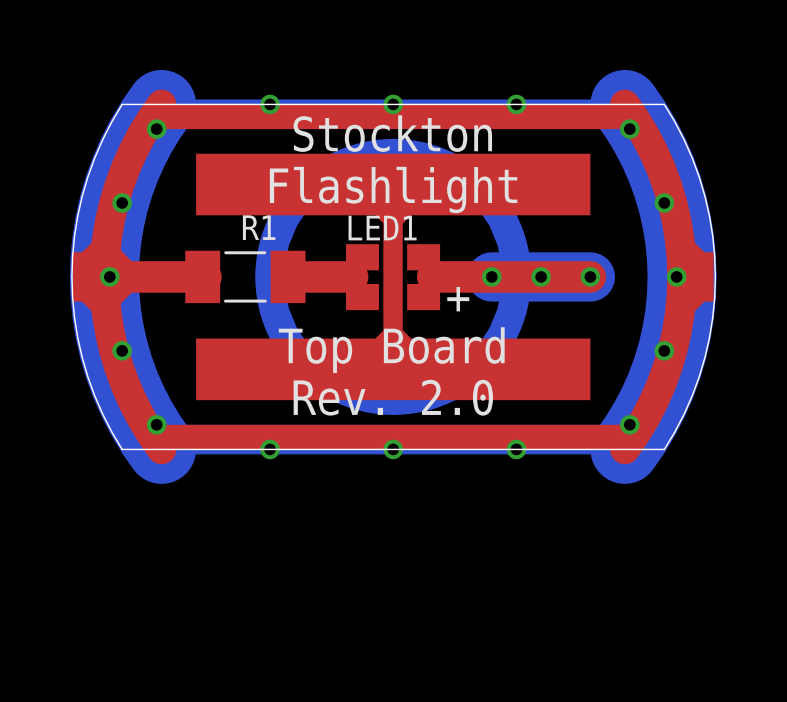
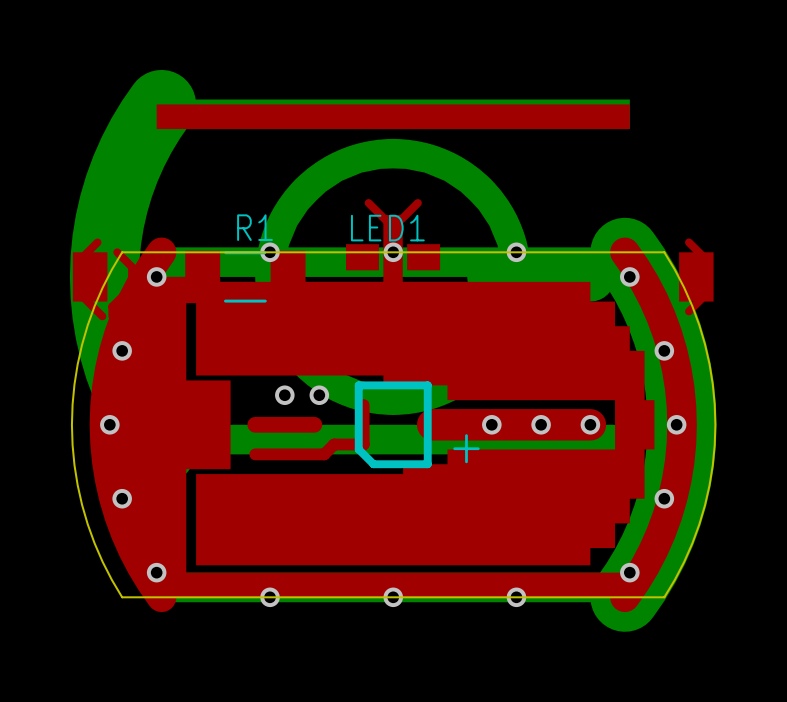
board edge: (122, 104) (664, 104) (684, 139) (705, 196) (712, 236) (715, 276) (712, 317) (705, 357) (684, 414) (664, 449) (122, 449) (94, 395) (82, 357) (74, 317) (71, 276) (74, 236) (82, 196) (94, 158) (122, 104) -> (122, 252) (664, 252) (684, 287) (705, 344) (712, 384) (715, 424) (712, 465) (705, 504) (684, 561) (664, 597) (122, 597) (94, 543) (82, 504) (74, 465) (71, 424) (74, 384) (82, 344) (94, 306) (122, 252)
top track: (161, 104) (141, 135) (119, 186) (109, 221) (104, 276) (109, 332) (119, 367) (141, 418) (161, 449) -> (161, 252) (141, 283) (119, 333) (106, 387) (104, 424) (106, 461) (119, 515) (141, 566) (161, 597)
via: (270, 104) -> none
via: (393, 104) -> none
via: (516, 104) -> none
top track: (624, 104) (645, 135) (667, 186) (676, 221) (682, 276) (676, 332) (667, 367) (645, 418) (624, 449) -> (624, 252) (653, 299) (667, 333) (679, 387) (682, 424) (679, 461) (667, 515) (645, 566) (624, 597)
bottom track: (624, 104) (645, 135) (667, 186) (676, 221) (682, 276) (676, 332) (667, 367) (645, 418) (624, 449) -> (624, 252) (645, 283) (667, 333) (679, 387) (682, 424) (679, 461) (667, 515) (653, 549) (624, 597)
via: (156, 129) -> none
via: (629, 129) -> none
text: Stockton (392, 133) -> none
drawing: [196, 153, 591, 216] -> none
text: Flashlight (393, 189) -> none
via: (122, 203) -> none
via: (664, 203) -> none
drawing: none -> [112, 247, 655, 603]
via: none -> (270, 252)
via: none -> (393, 252)
via: none -> (516, 252)
top track: (109, 276) (205, 276) -> none
via: (109, 276) -> none
via: none -> (156, 276)
top track: (288, 276) (352, 276) (362, 297) -> none
top track: (432, 276) (590, 276) -> (432, 424) (590, 424)
via: (491, 276) -> none
via: (541, 276) -> none
via: (590, 276) -> none
via: none -> (629, 276)
via: (676, 276) -> none
text position: + (458, 299) -> + (466, 448)
drawing: [196, 338, 591, 401] -> none
text: Top Board (391, 350) -> none
line: none -> (358, 385) (427, 385) (427, 464) (373, 464) (358, 449) (358, 385)
via: none -> (284, 395)
via: none -> (319, 395)
text: Rev. 2.0 (393, 397) -> none
top track: none -> (363, 405) (363, 444) (334, 444) (324, 454) (255, 454)
via: none -> (109, 424)
via: (156, 424) -> none
top track: none -> (255, 424) (314, 424)
via: none -> (491, 424)
via: none -> (541, 424)
via: none -> (590, 424)
via: (629, 424) -> none
via: none -> (676, 424)
drawing position: (395, 437) -> (395, 584)
via: (270, 449) -> none
via: (393, 449) -> none
via: (516, 449) -> none
via: none -> (122, 498)
via: none -> (664, 498)
via: none -> (156, 572)
via: none -> (629, 572)
via: none -> (270, 597)
via: none -> (393, 597)
via: none -> (516, 597)

